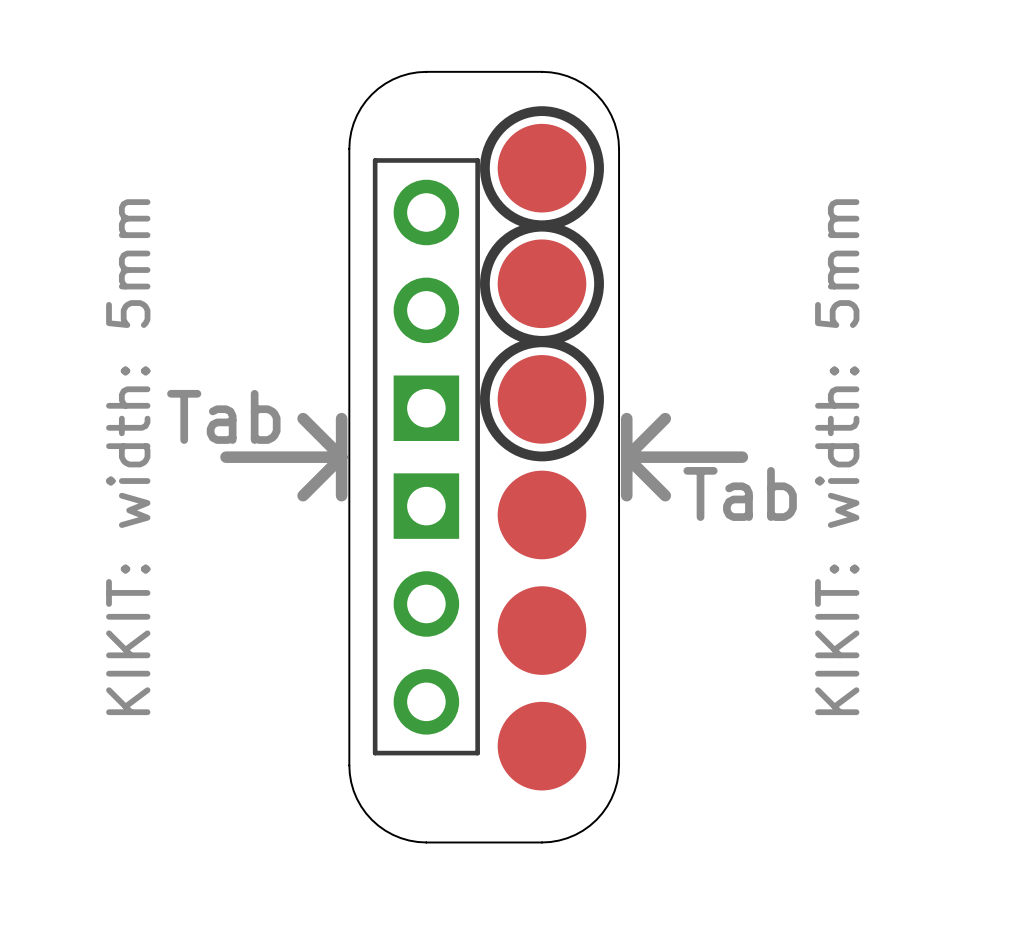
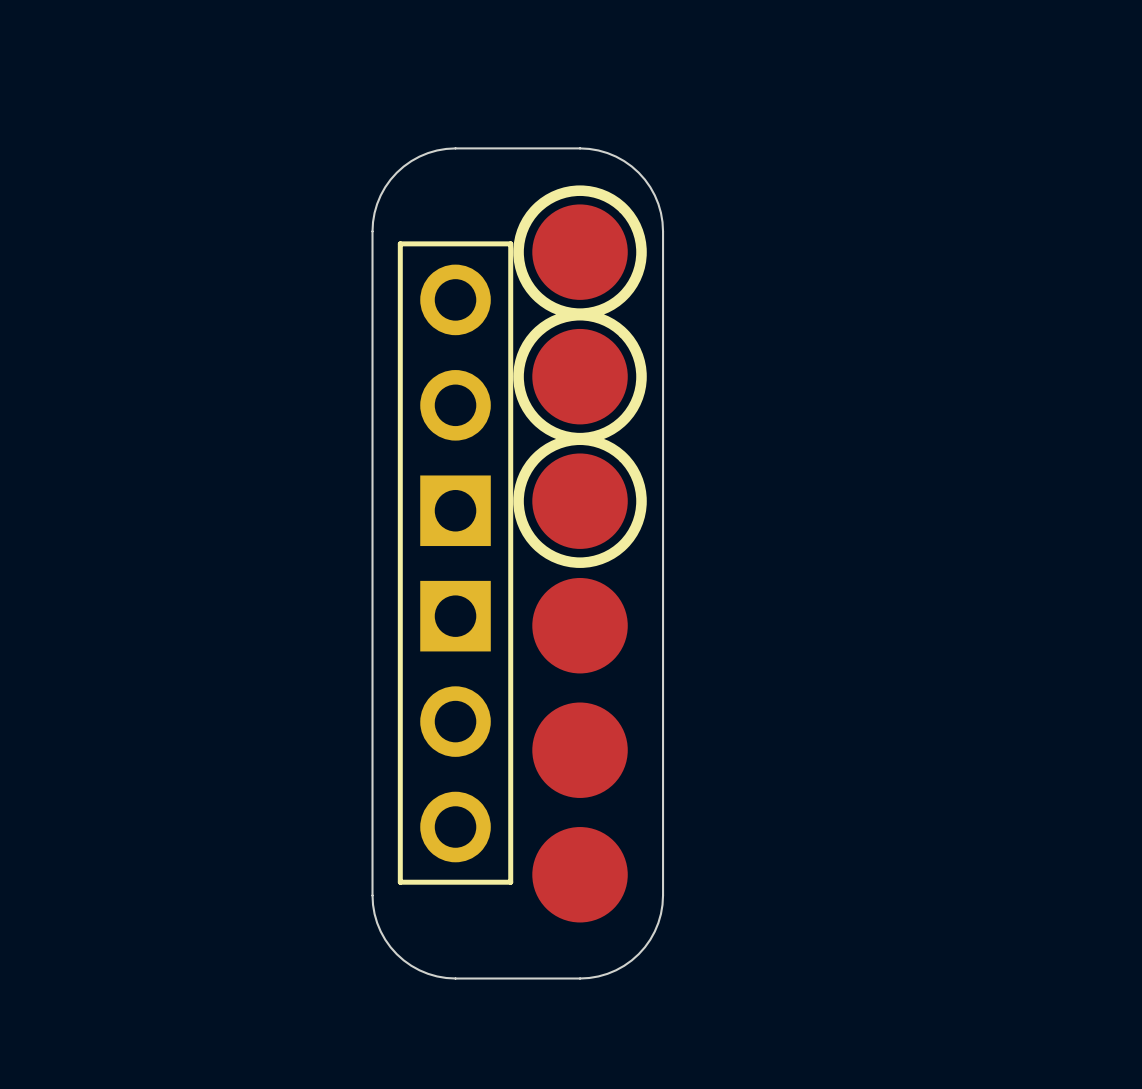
drawing: [220, 412, 348, 502] -> none
drawing: [620, 412, 749, 502] -> none

